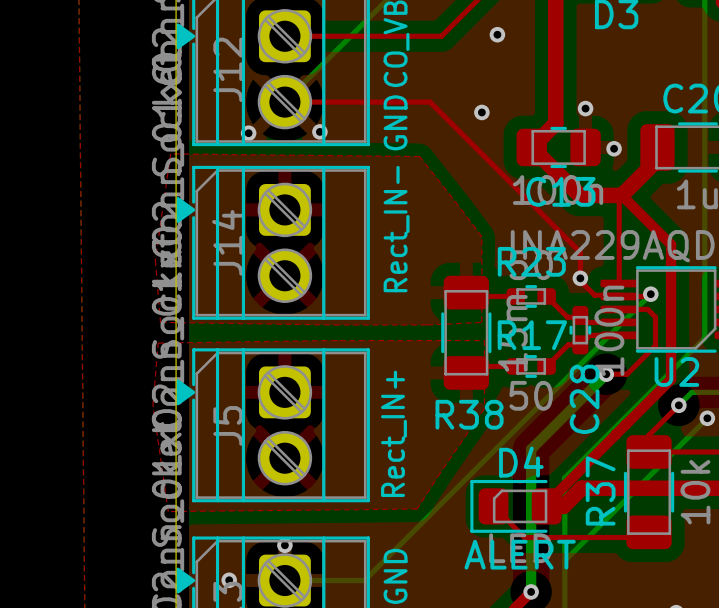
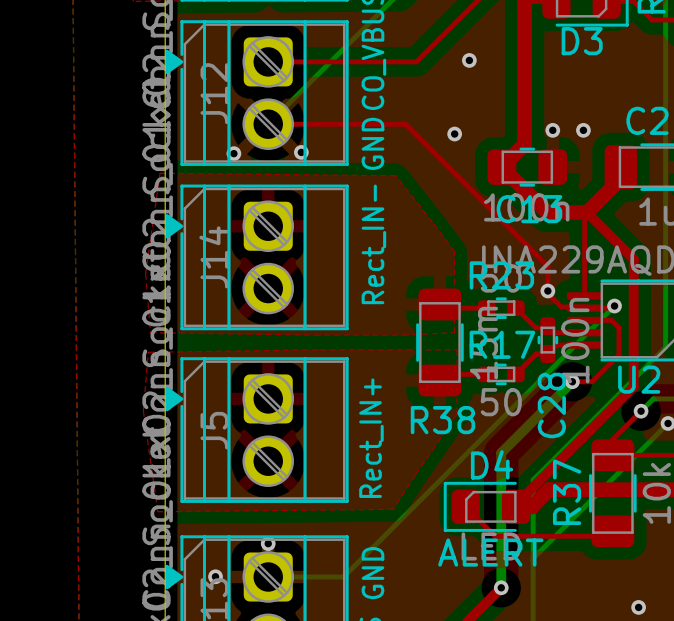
via position: (614, 148) -> (583, 130)

